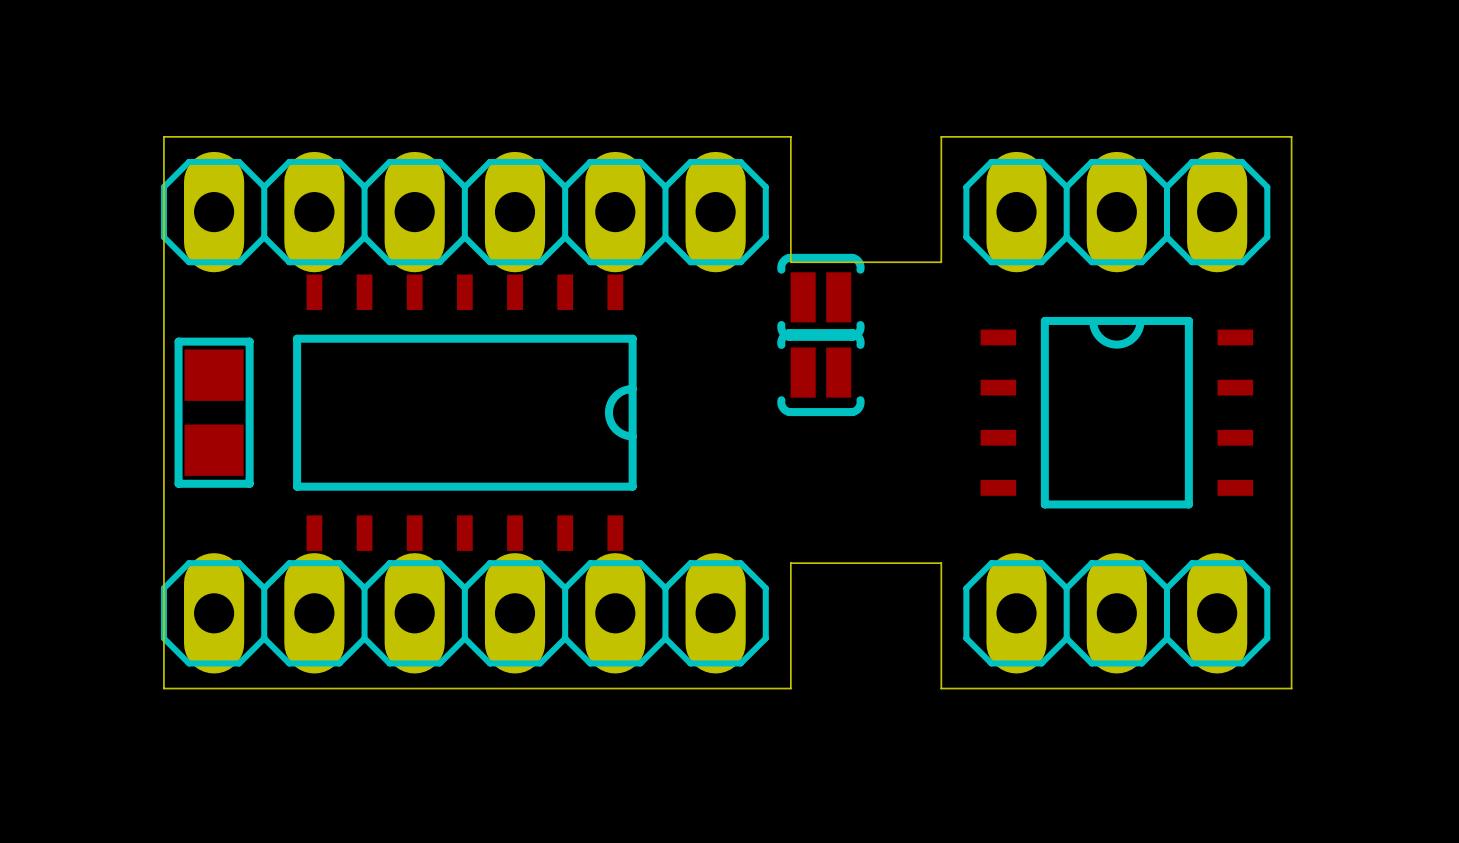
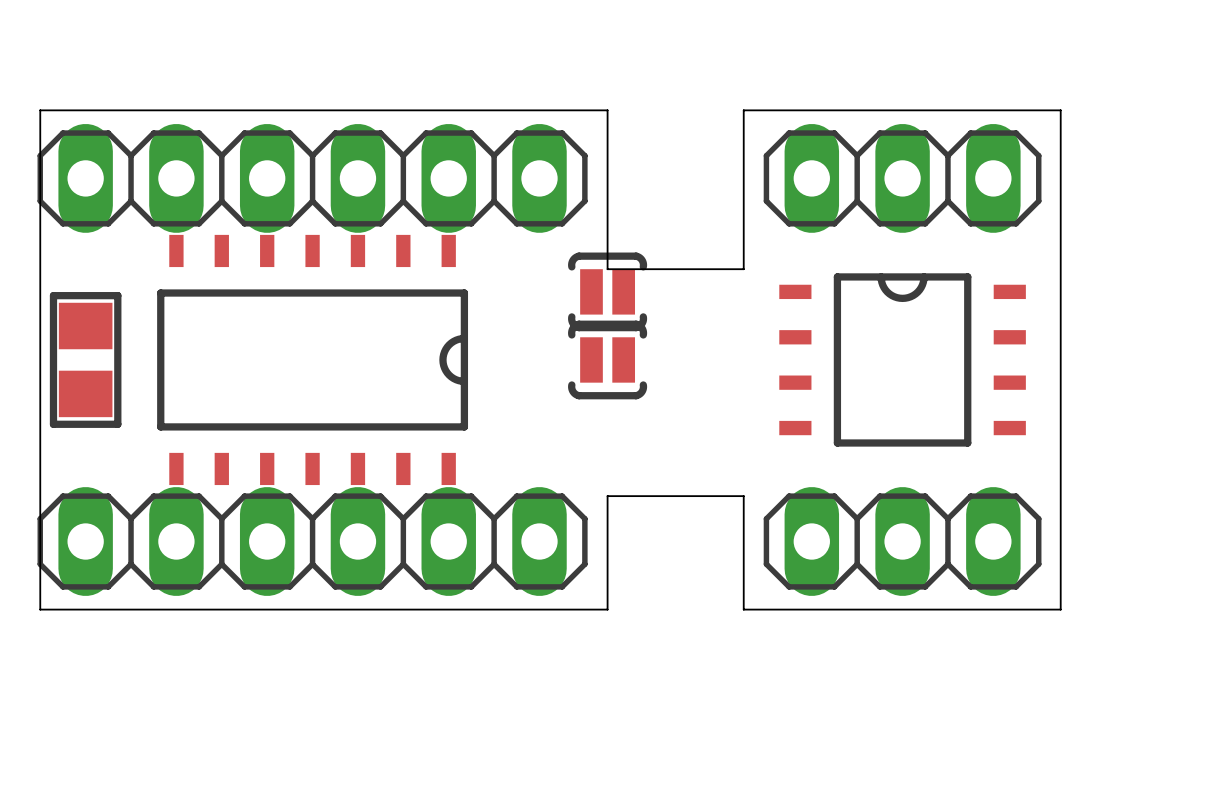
board edge: (790, 262) (941, 262) -> (607, 223) (607, 269) (743, 269) (743, 223)
part: (820, 297) -> none
part: none -> (607, 291)
part: (820, 372) -> none
part: none -> (607, 359)

